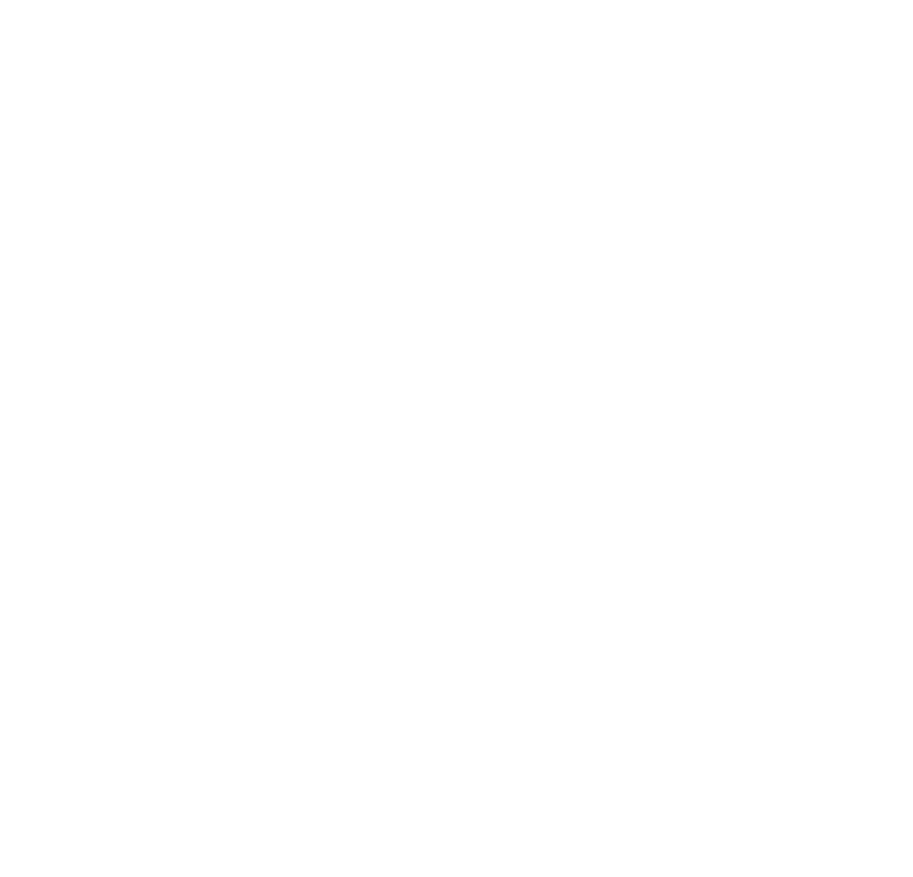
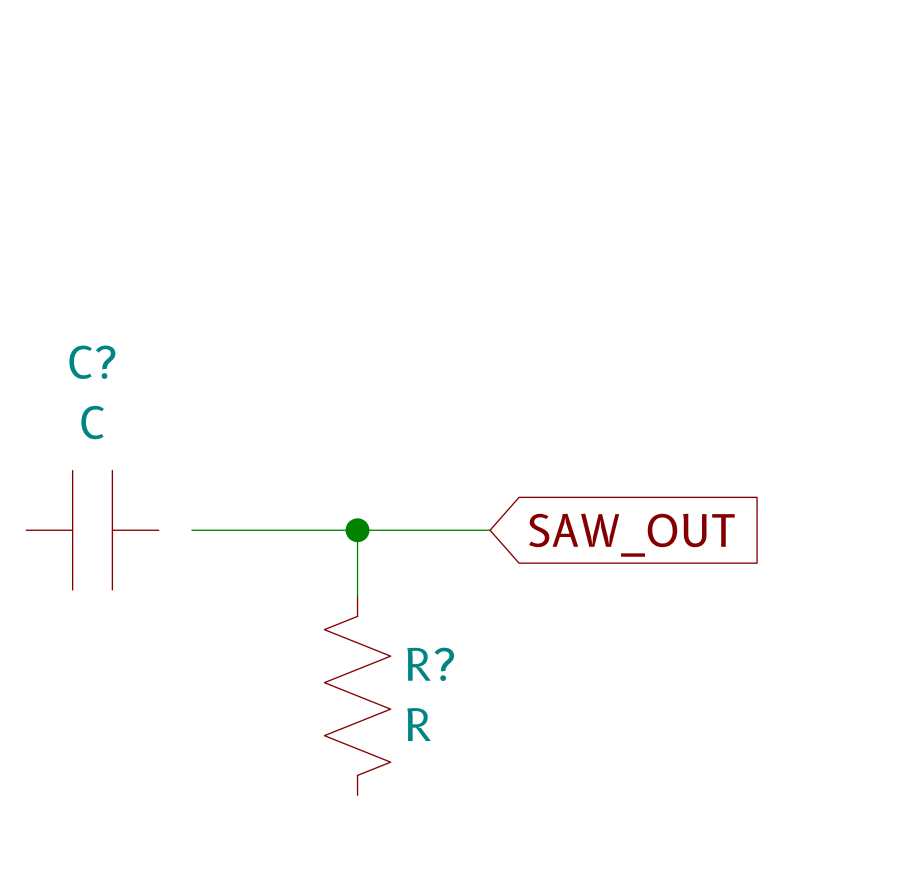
C?: none -> C (92, 530)
wire: none -> (191, 530) (490, 530)
wire: none -> (357, 530) (357, 596)
junction: none -> (357, 530)
global label: none -> SAW_OUT (631, 535)
R?: none -> R (357, 695)

